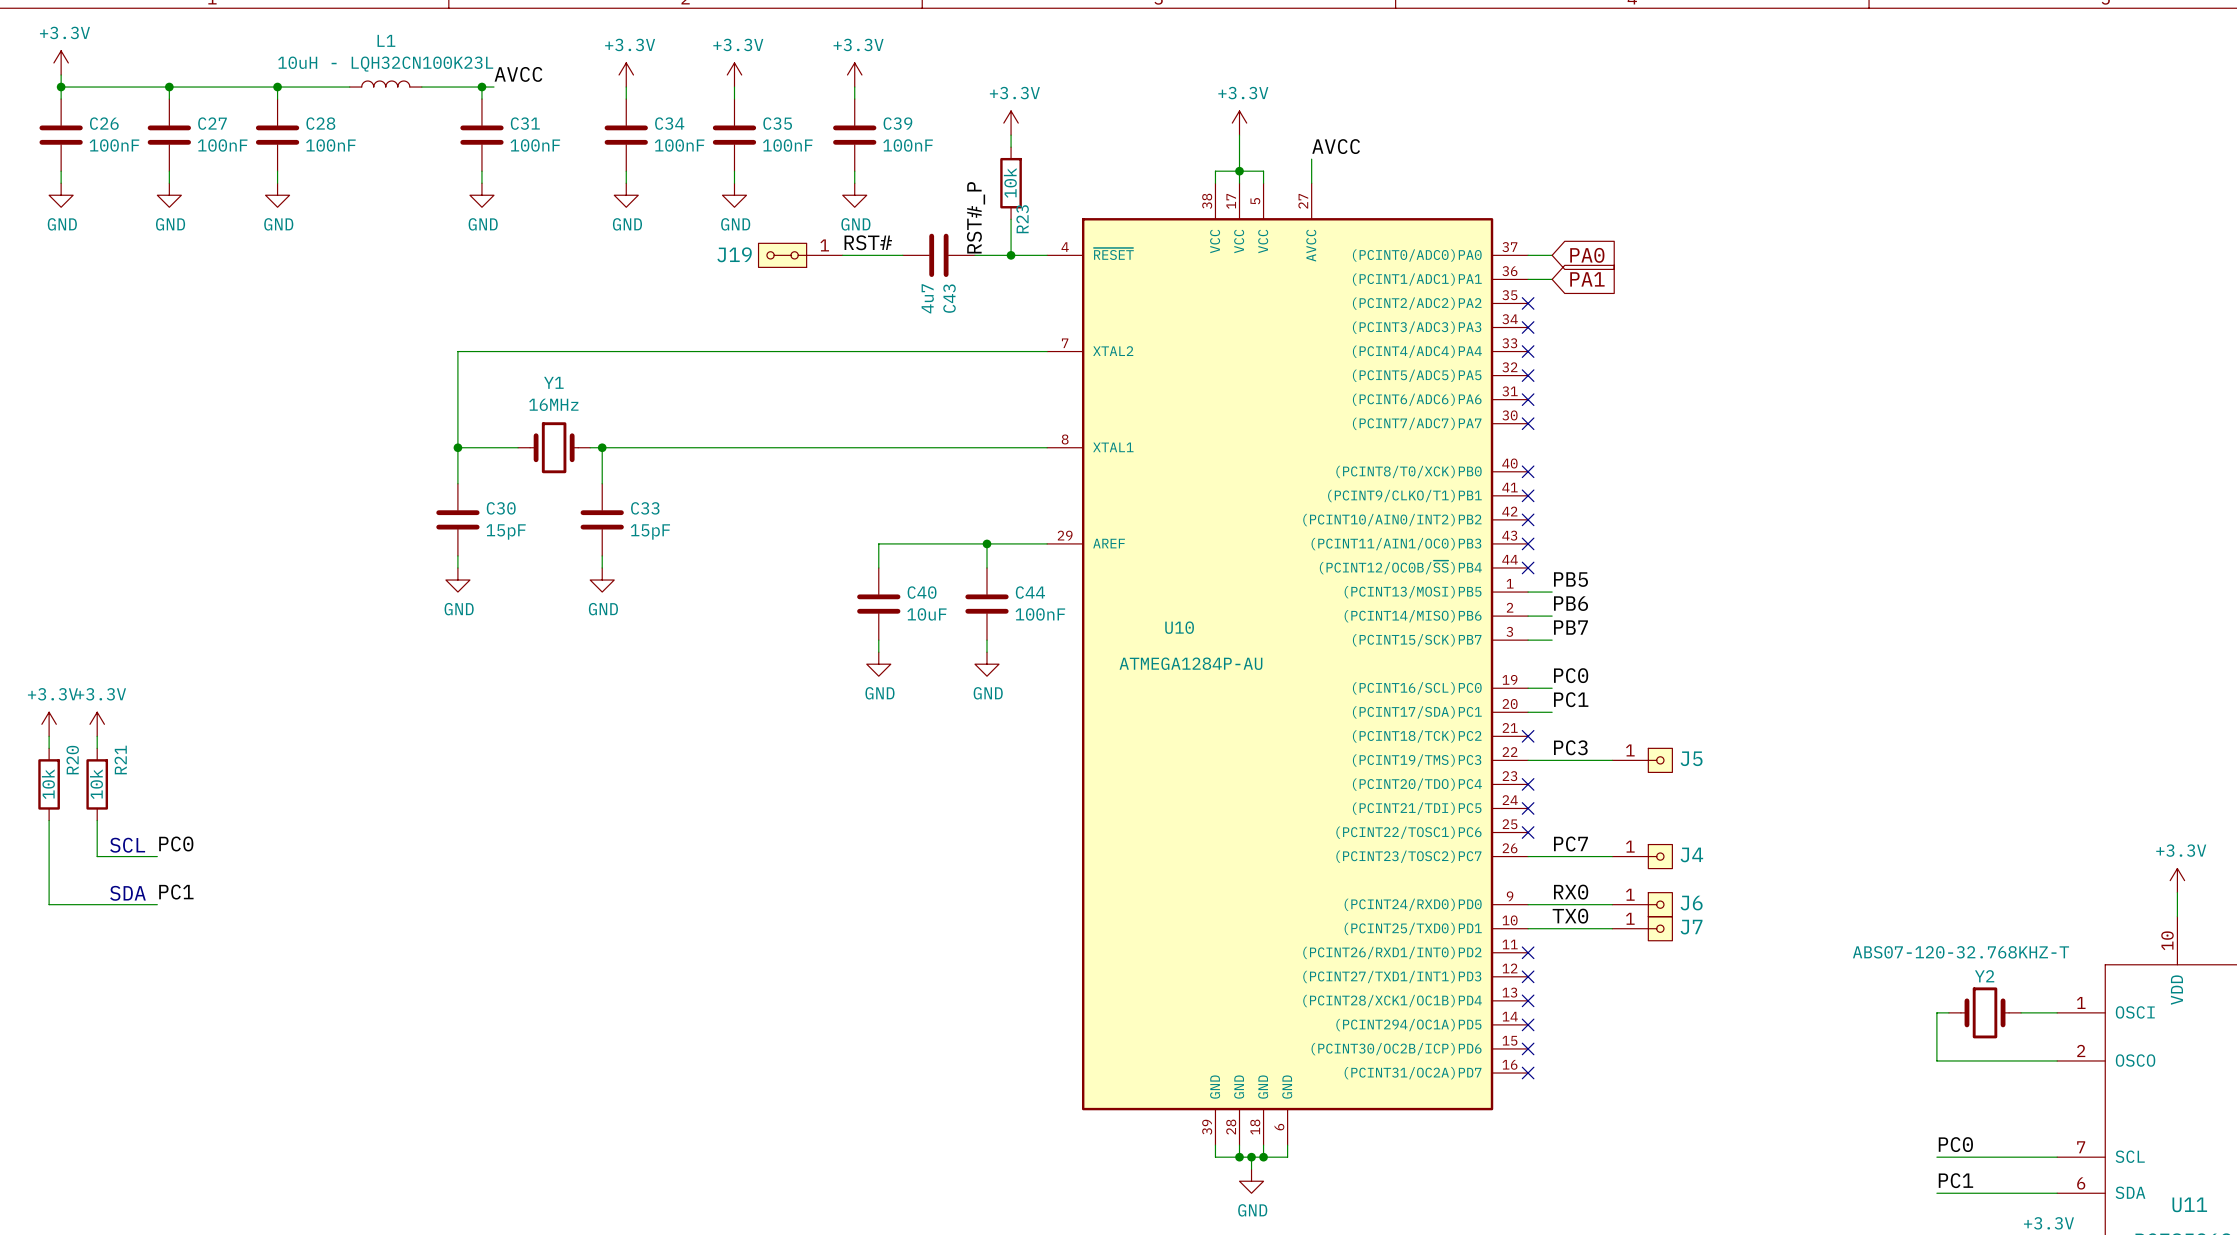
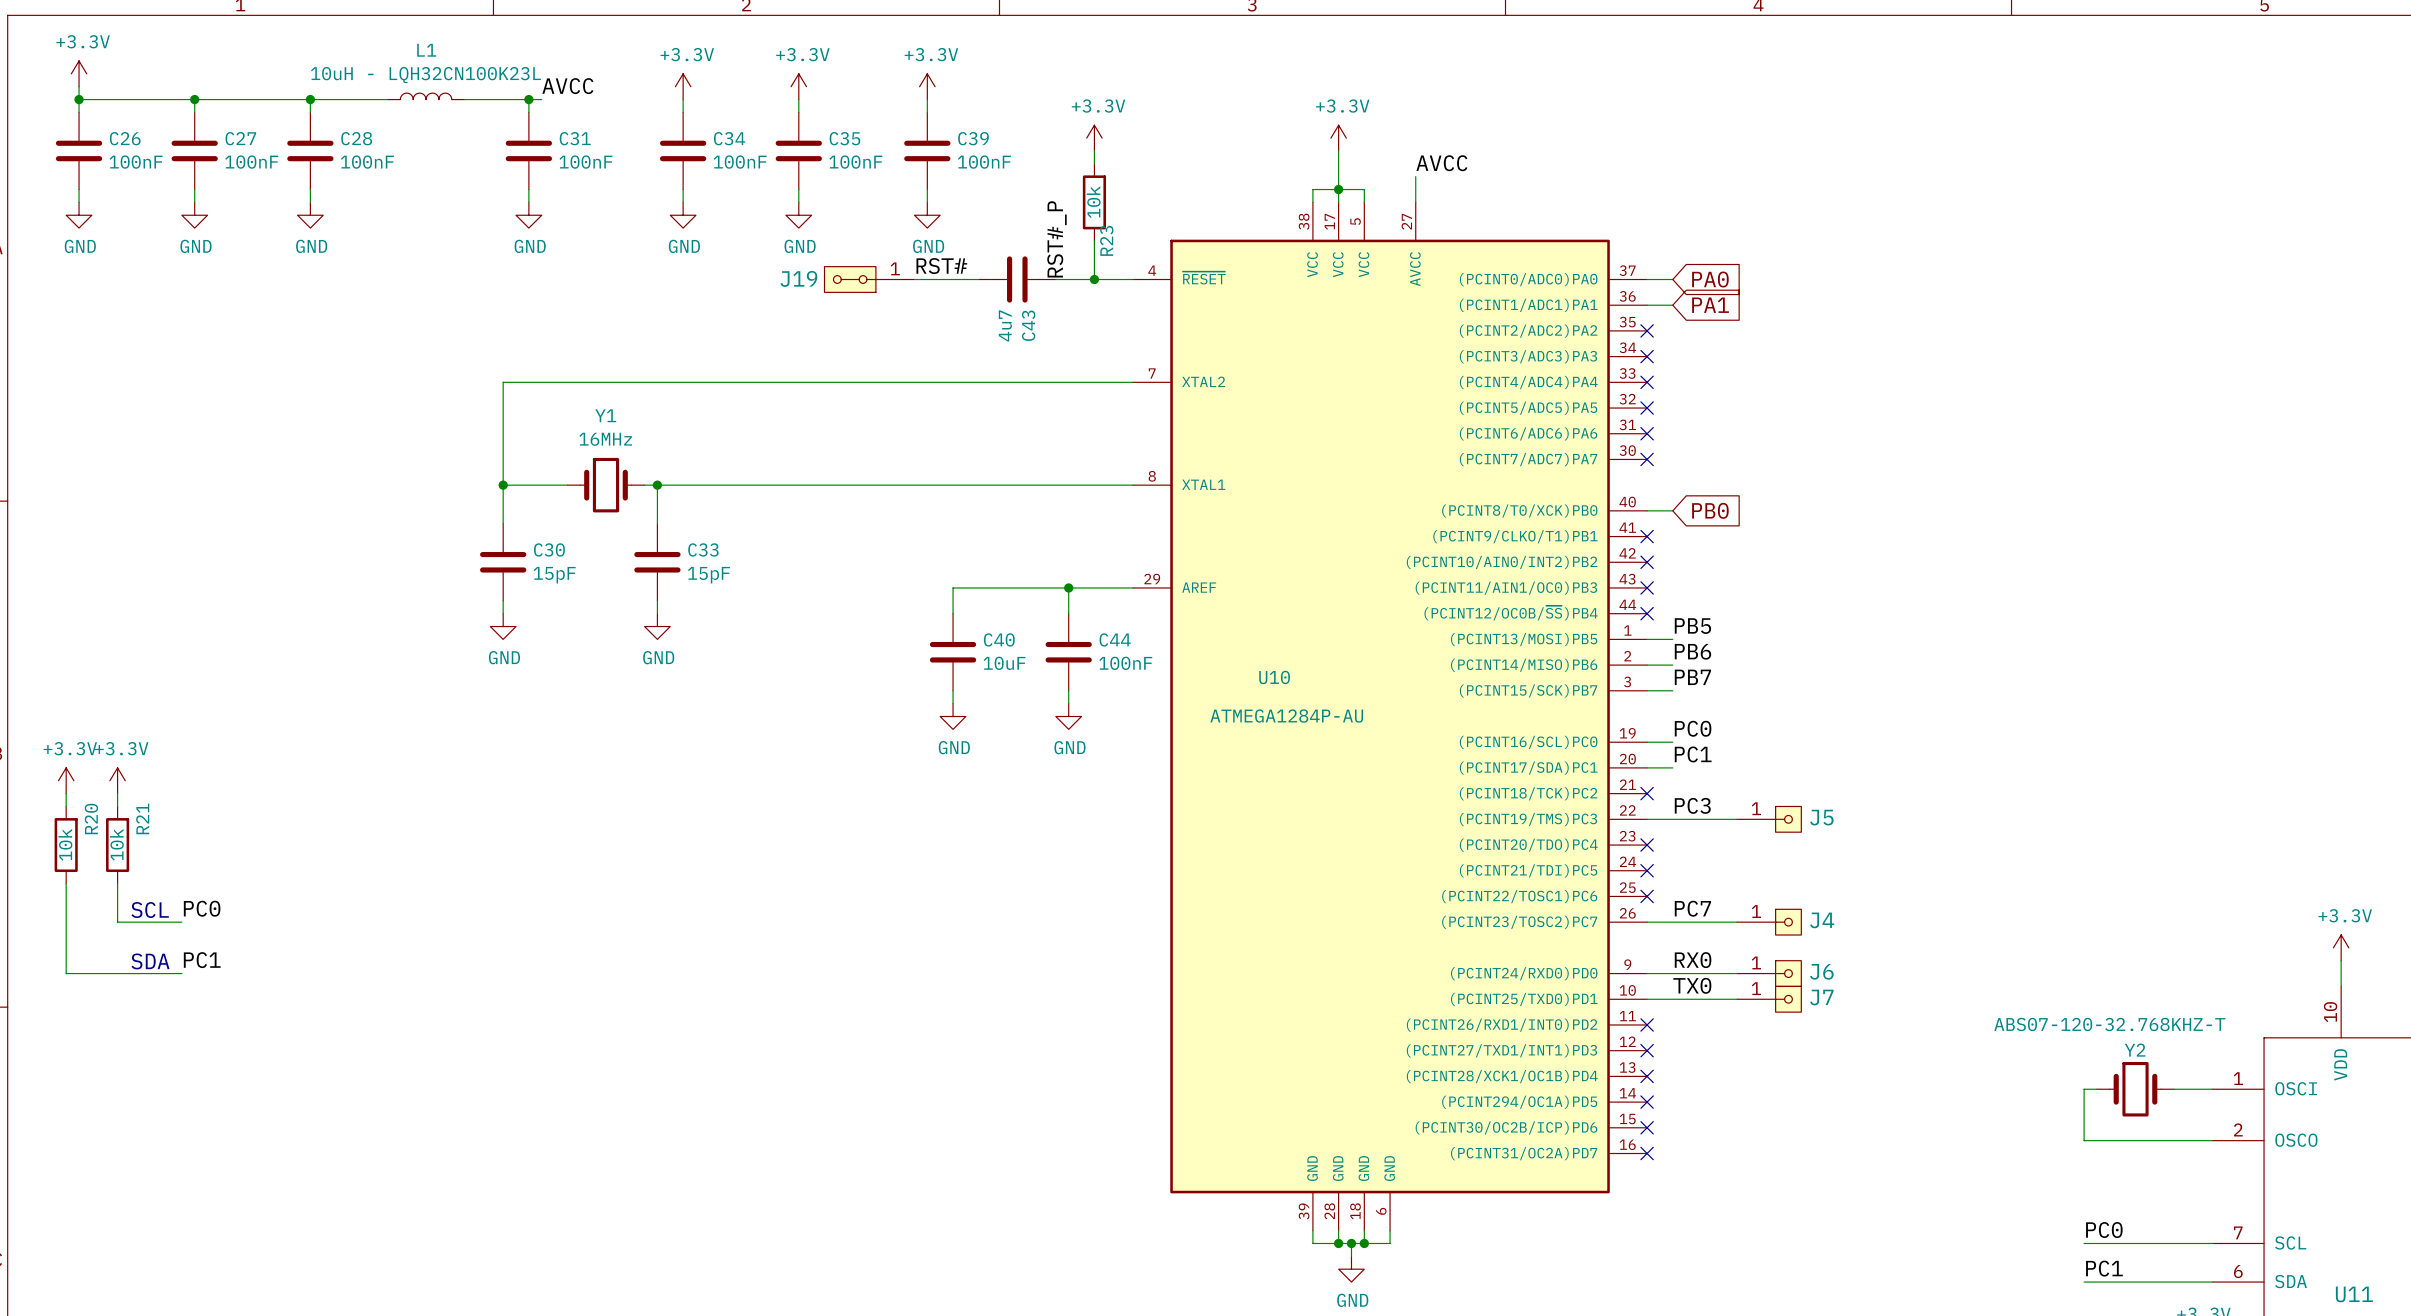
wire: none -> (1647, 510) (1672, 510)
no-connect mark: (1528, 471) -> none
global label: none -> PB0 (1710, 510)

